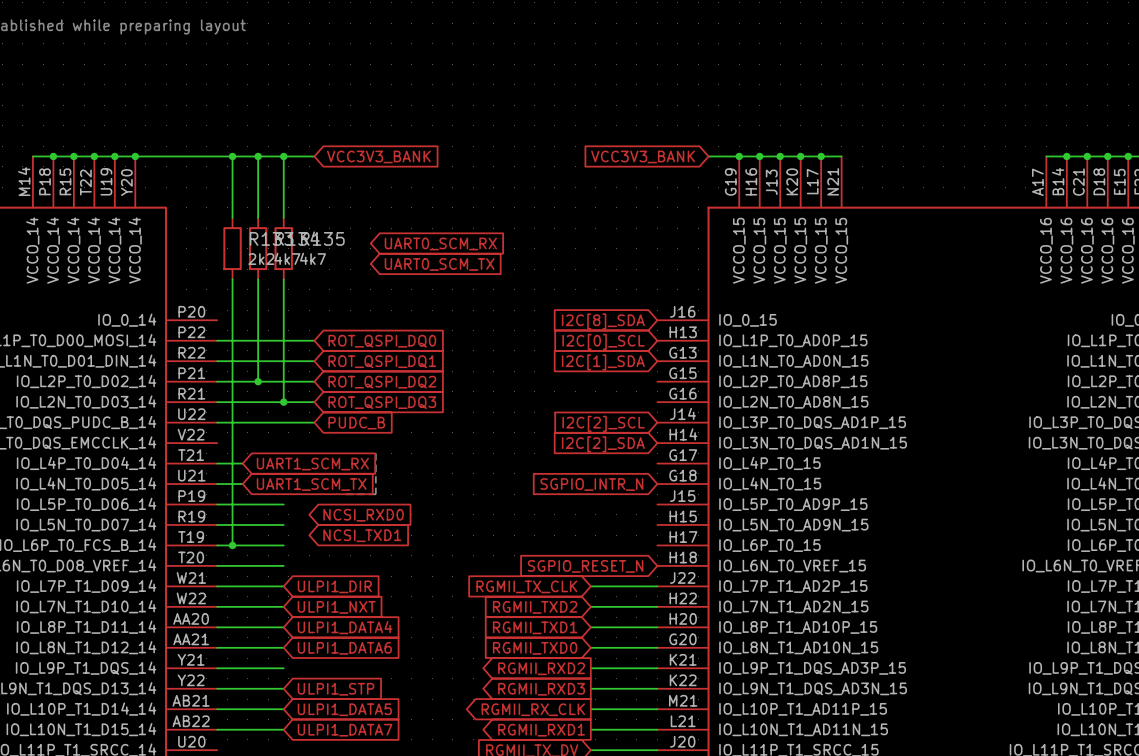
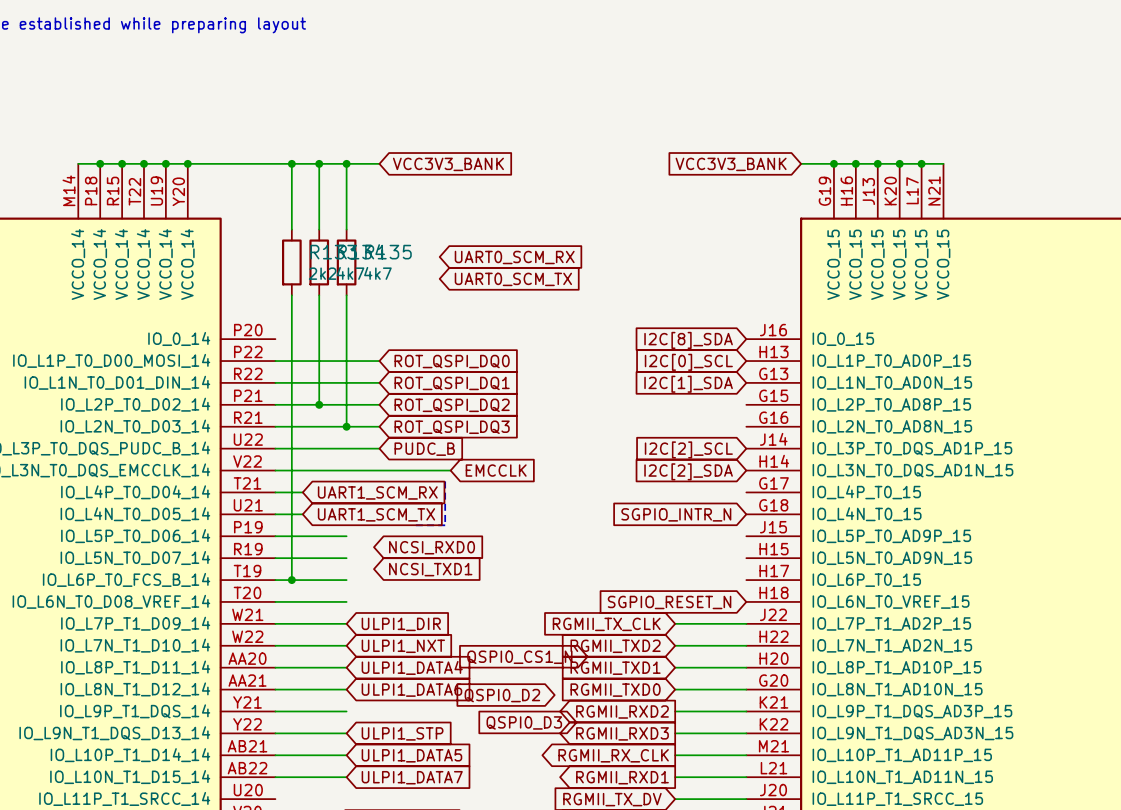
wire: none -> (275, 470) (450, 470)
global label: none -> EMCCLK (496, 470)
global label: none -> QSPI0_CS1_N (519, 657)
global label: none -> QSPI0_D2 (502, 695)
global label: none -> QSPI0_D3 (524, 722)

